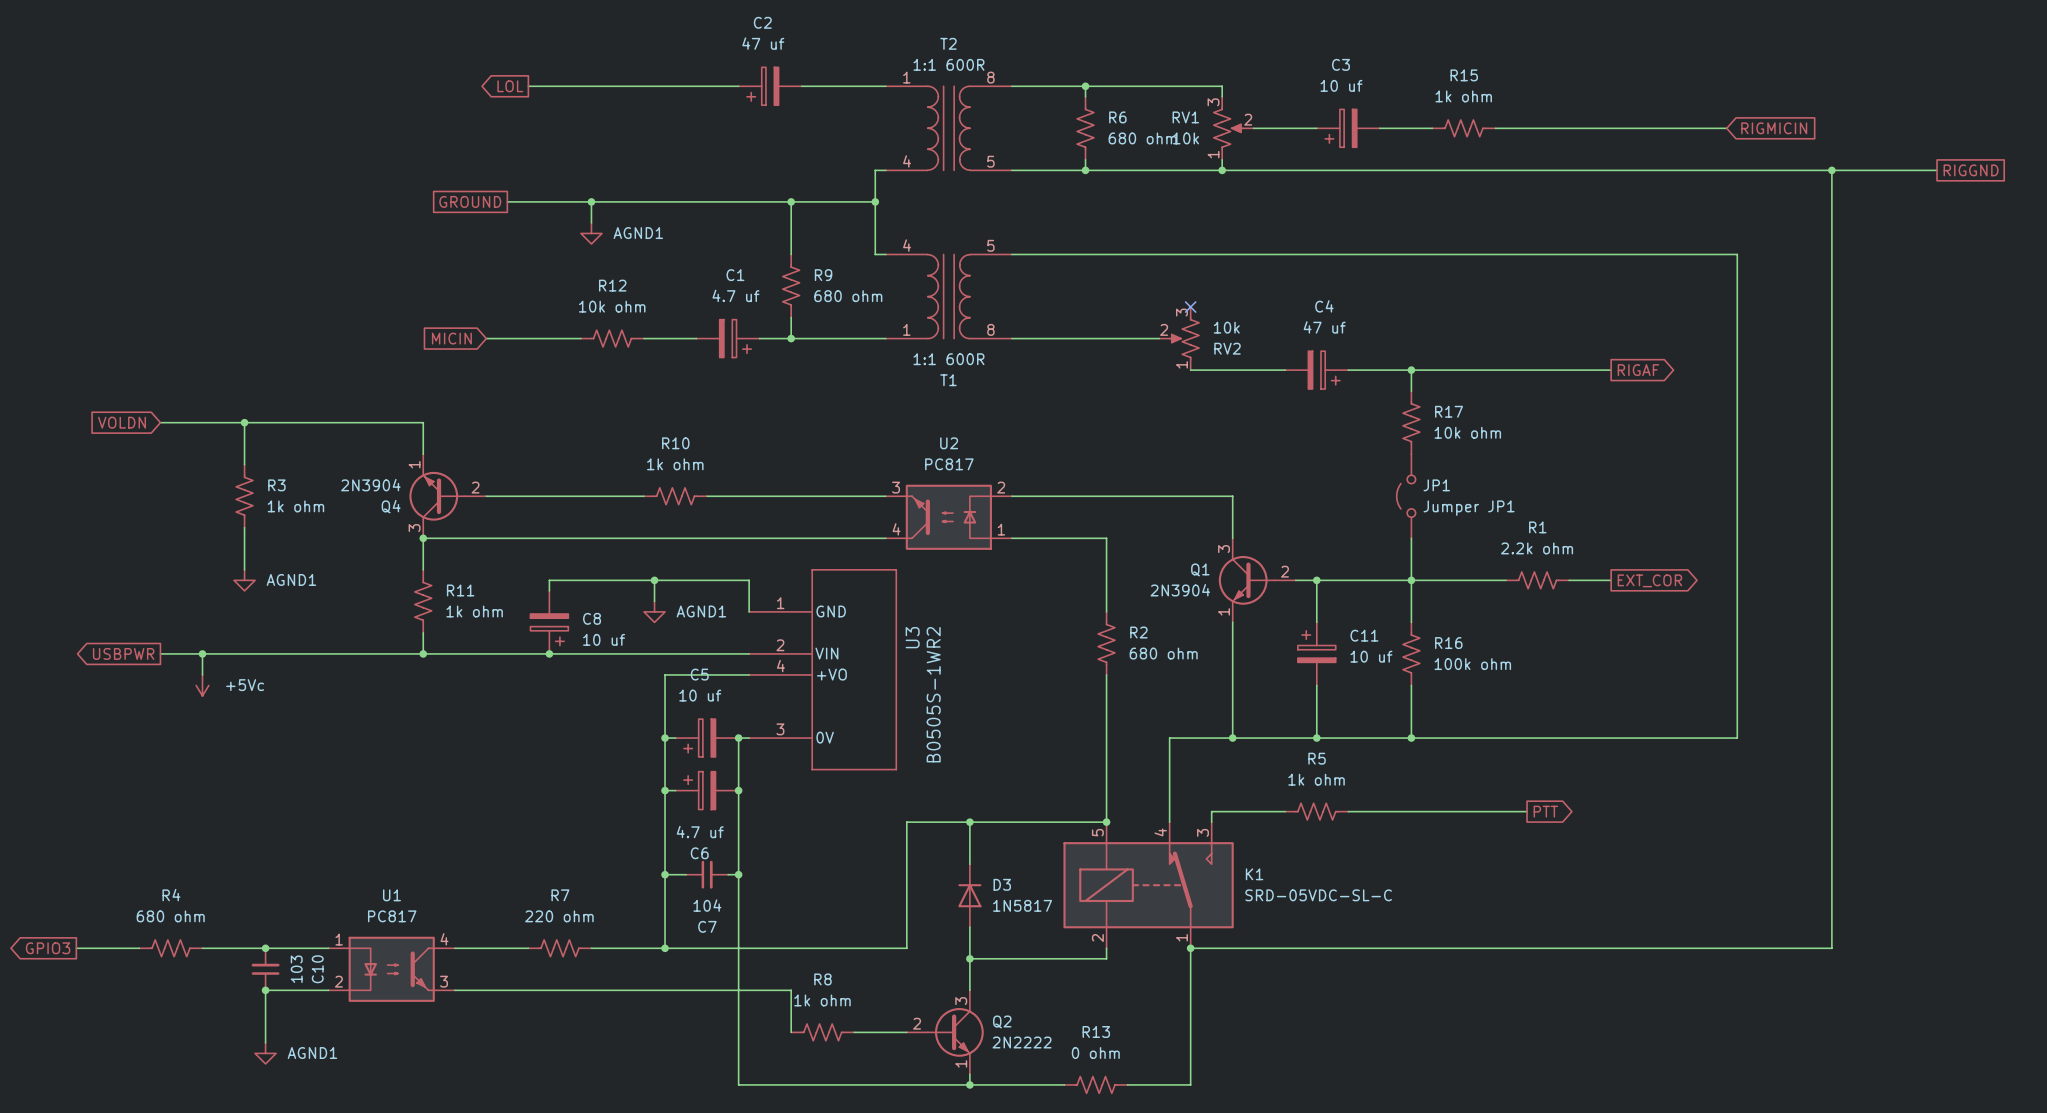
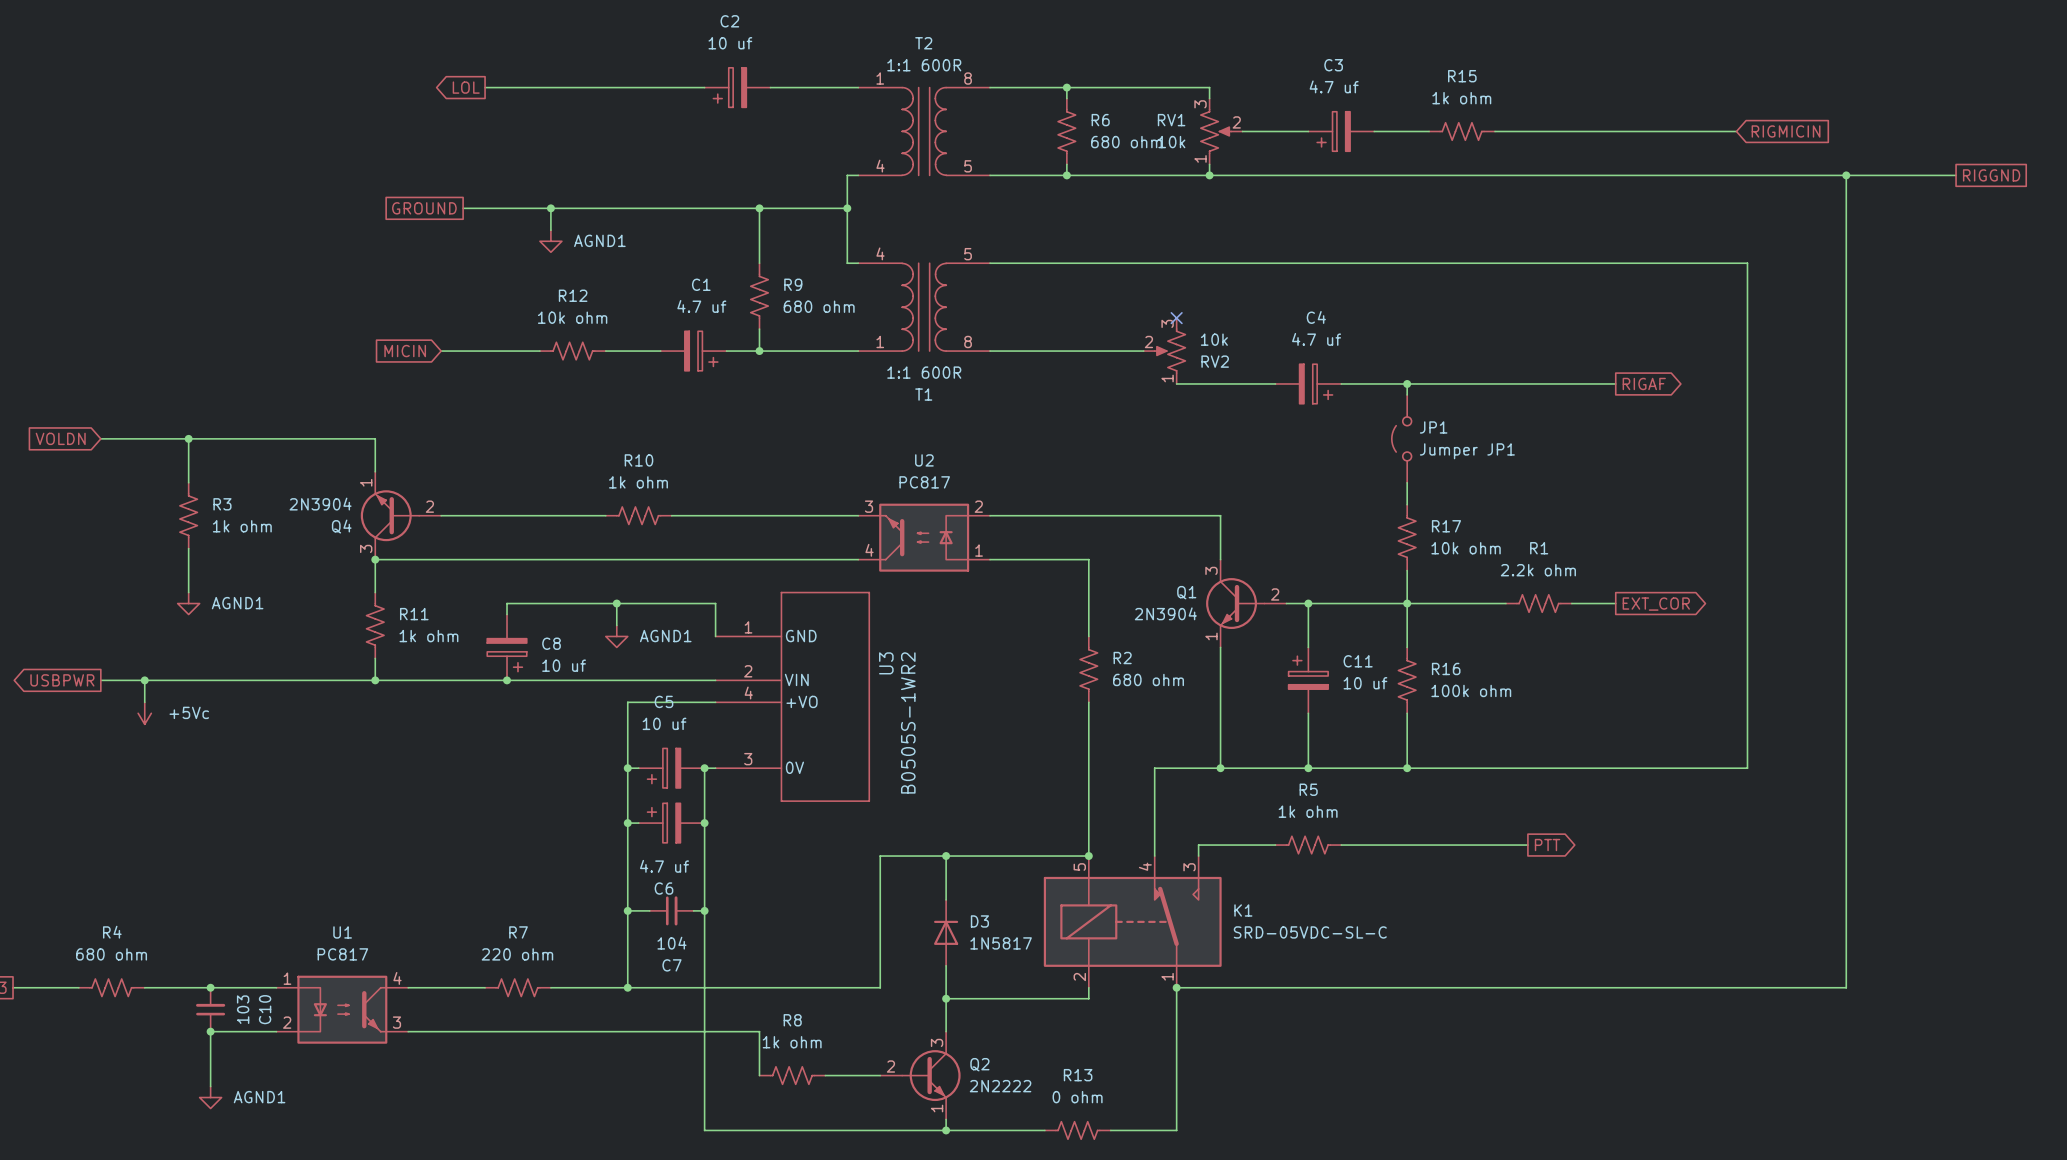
C2 value: 47 uf (763, 43) -> 10 uf (730, 43)
C3 value: 10 uf (1341, 85) -> 4.7 uf (1334, 86)
C4 value: 47 uf (1324, 327) -> 4.7 uf (1316, 339)
R17 position: (1411, 422) -> (1407, 537)
JP1 position: (1406, 496) -> (1401, 438)

